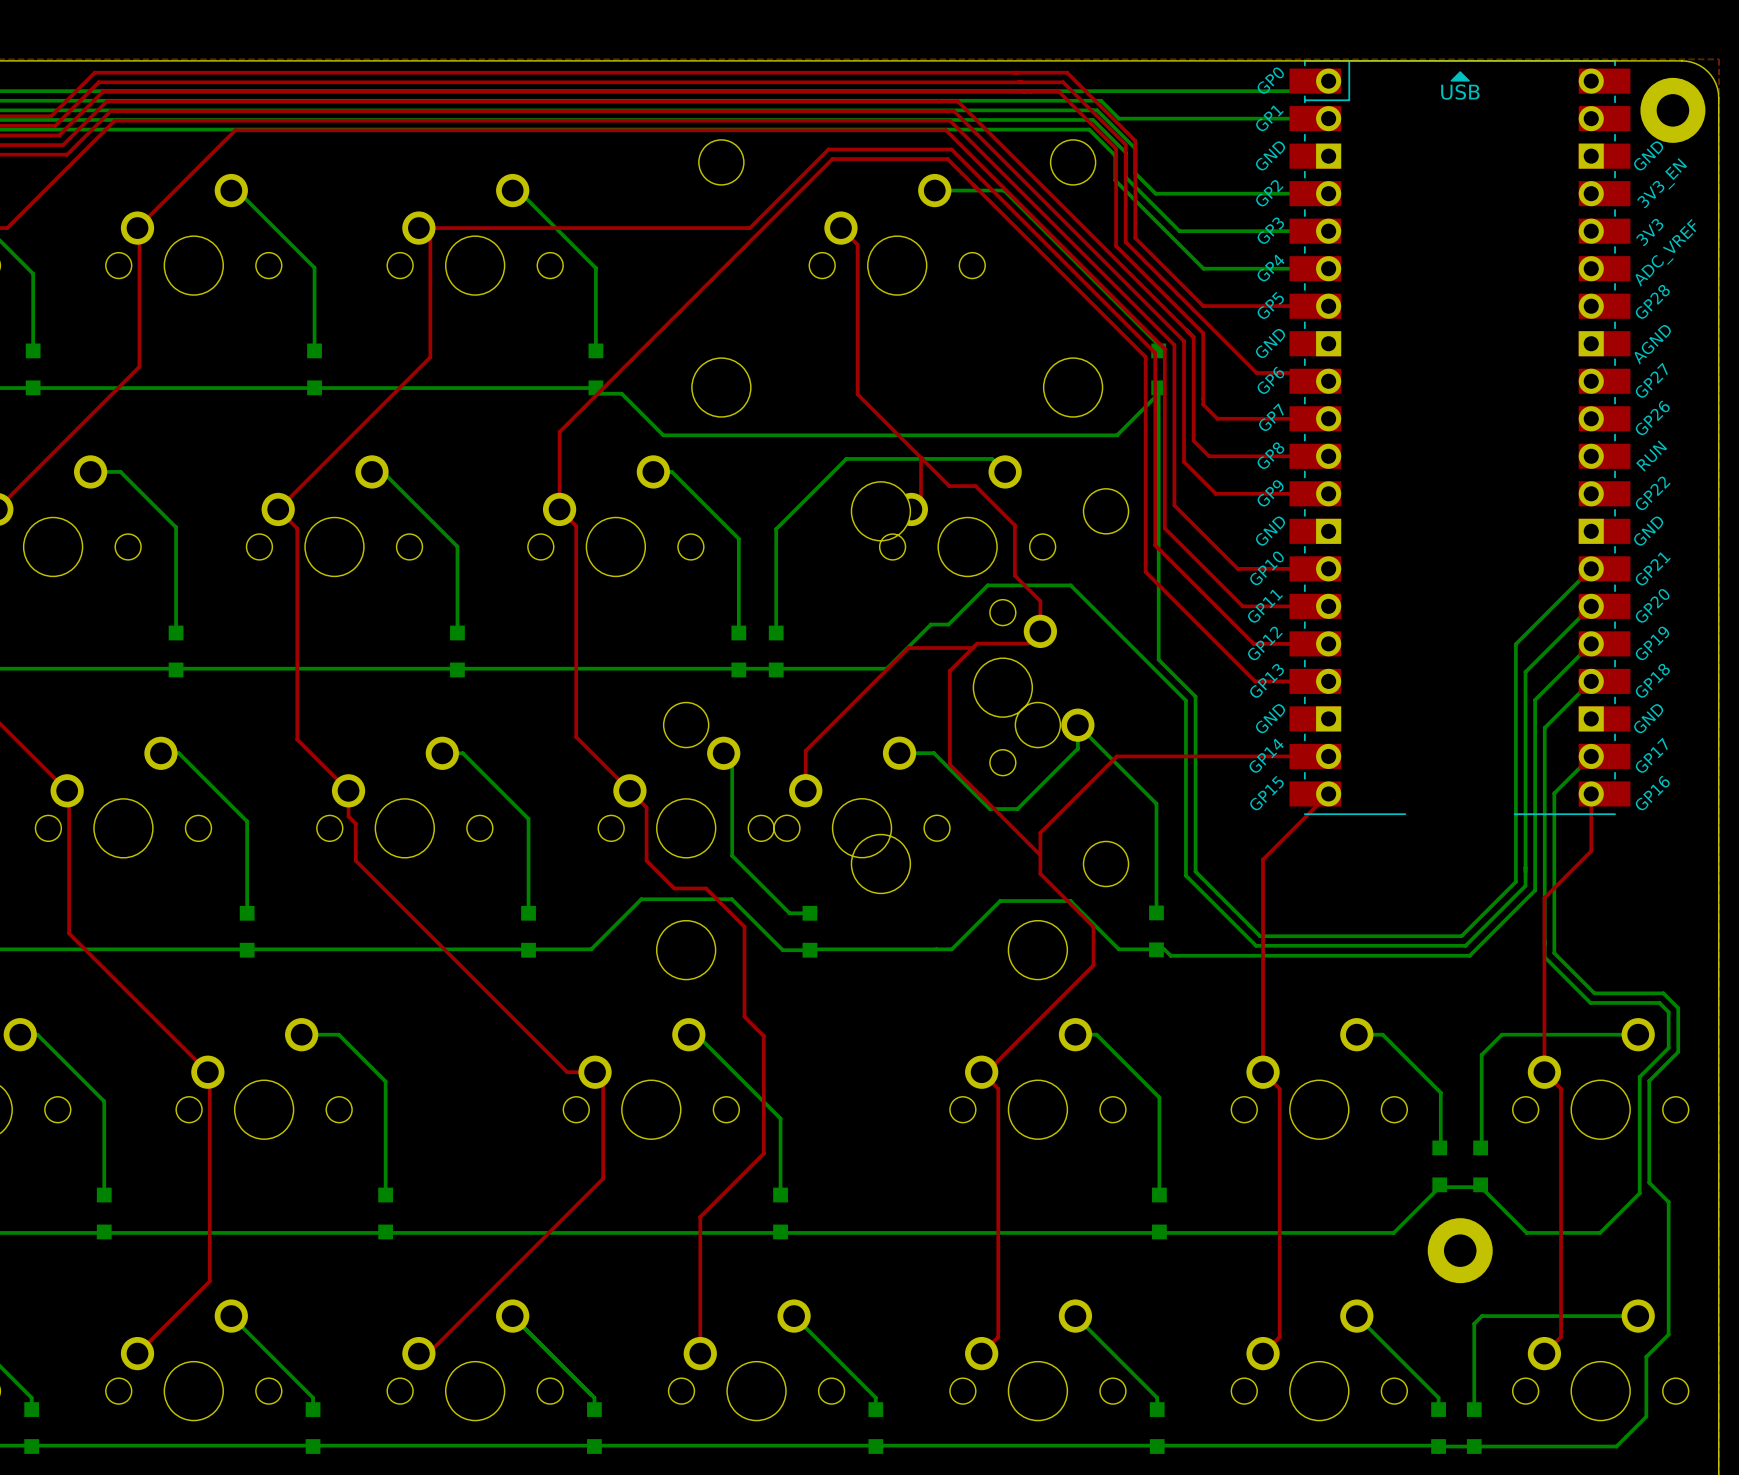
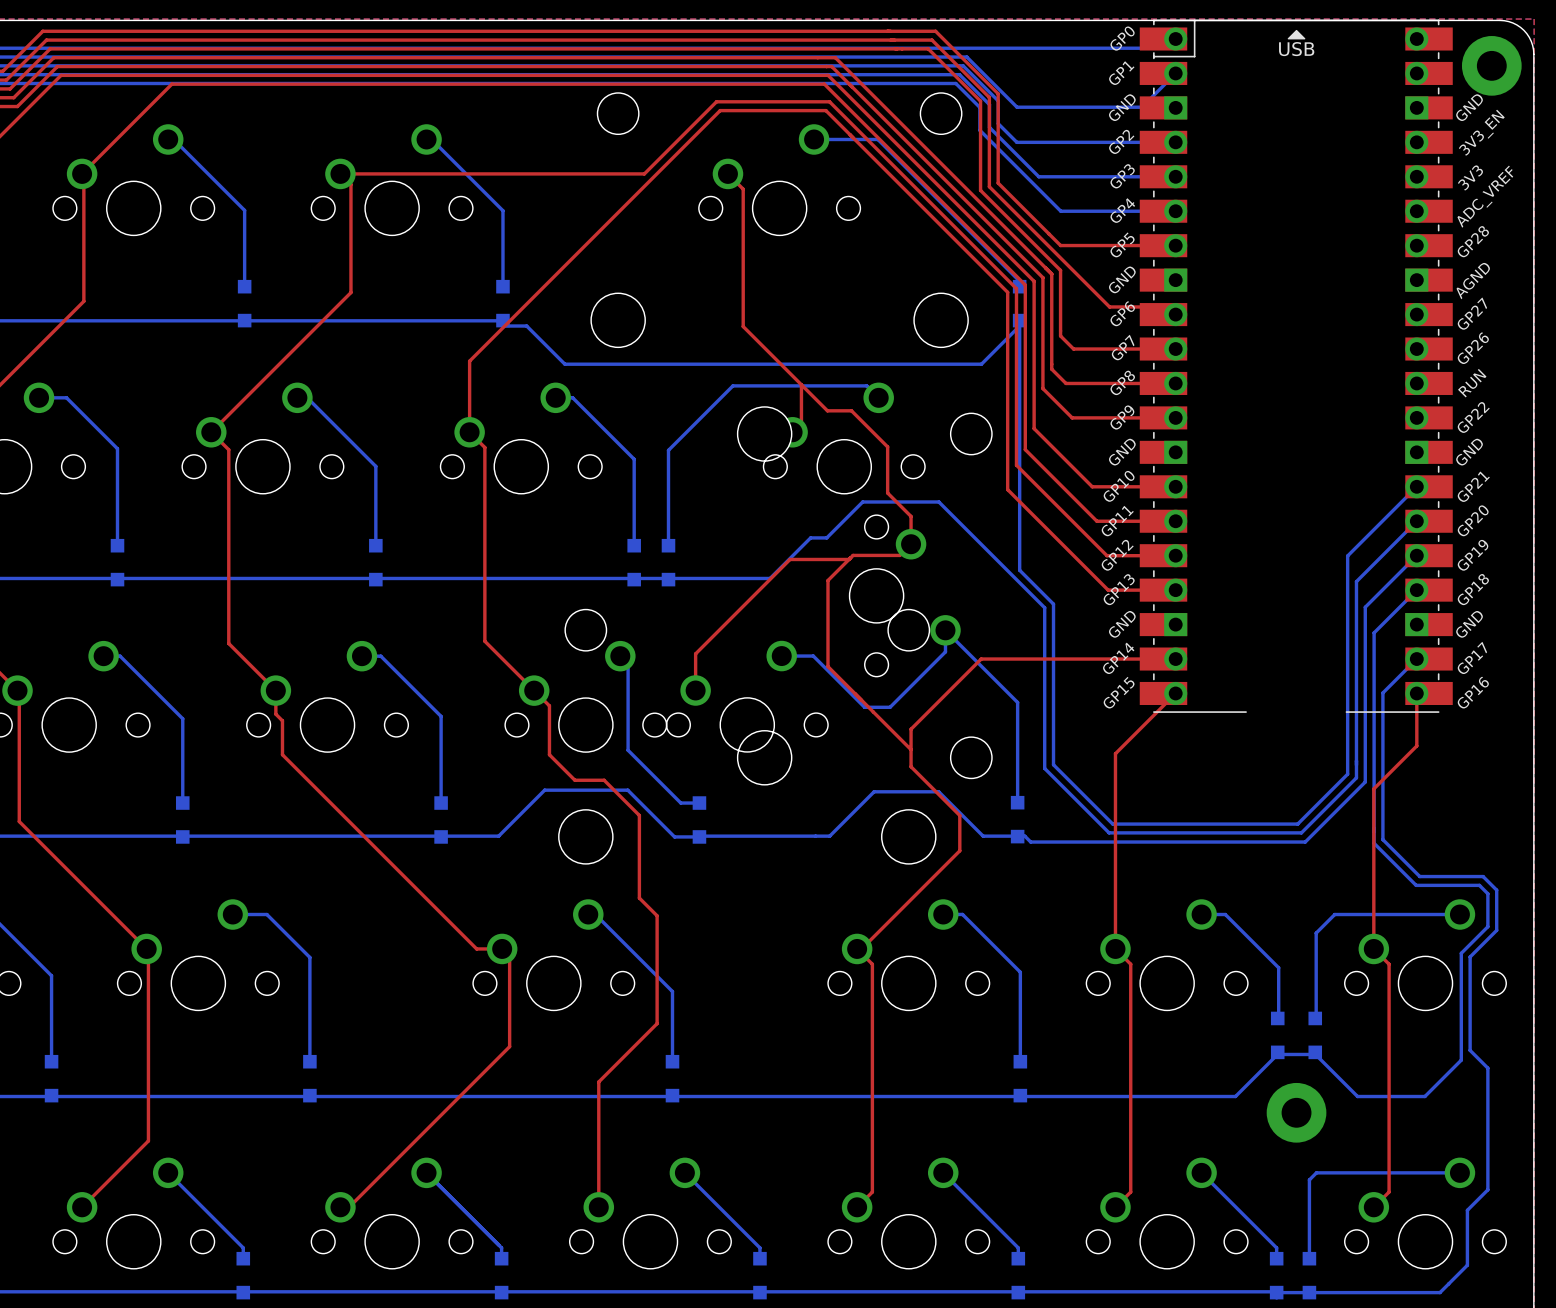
bottom track: (1119, 118) (1328, 118) -> (983, 73) (1017, 107) (1141, 107) (1175, 73)

